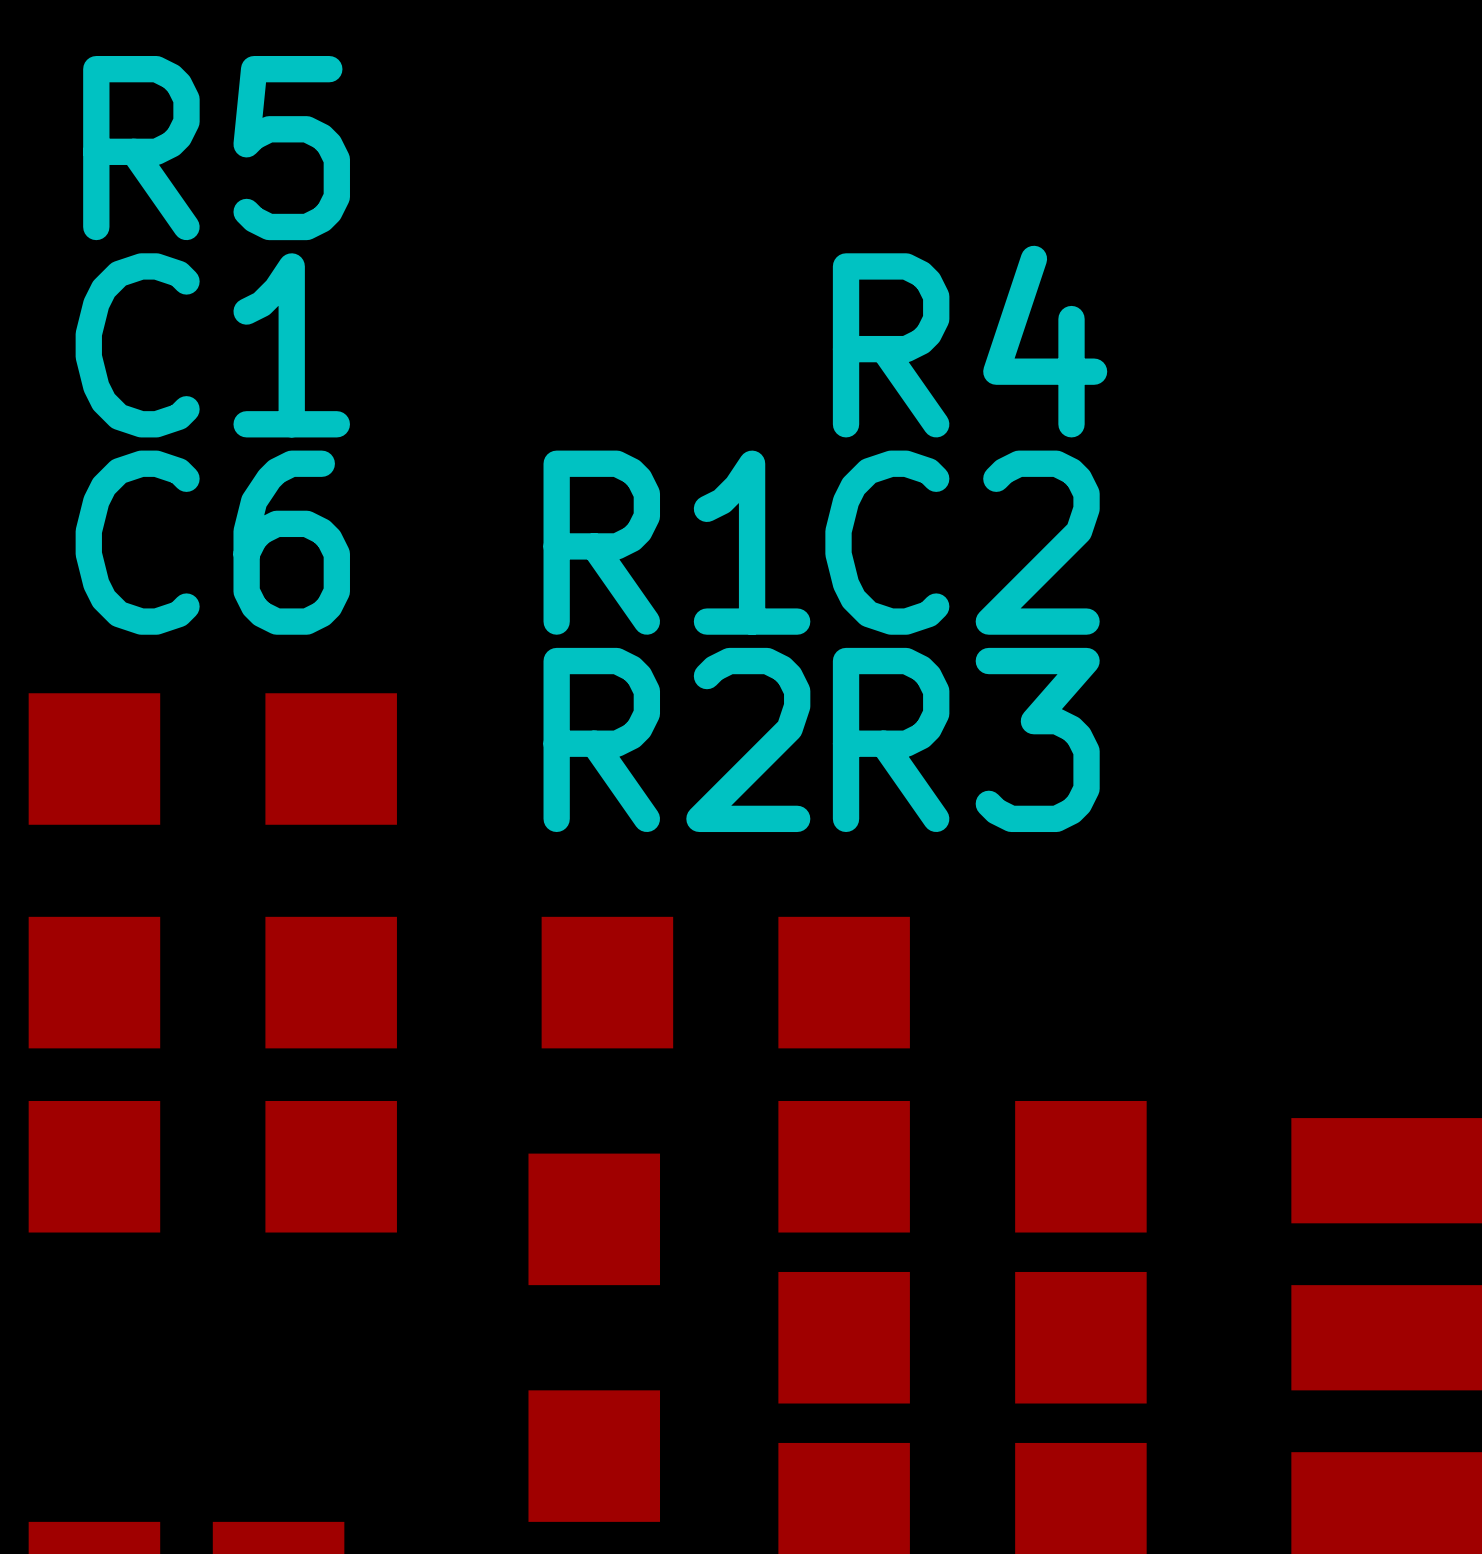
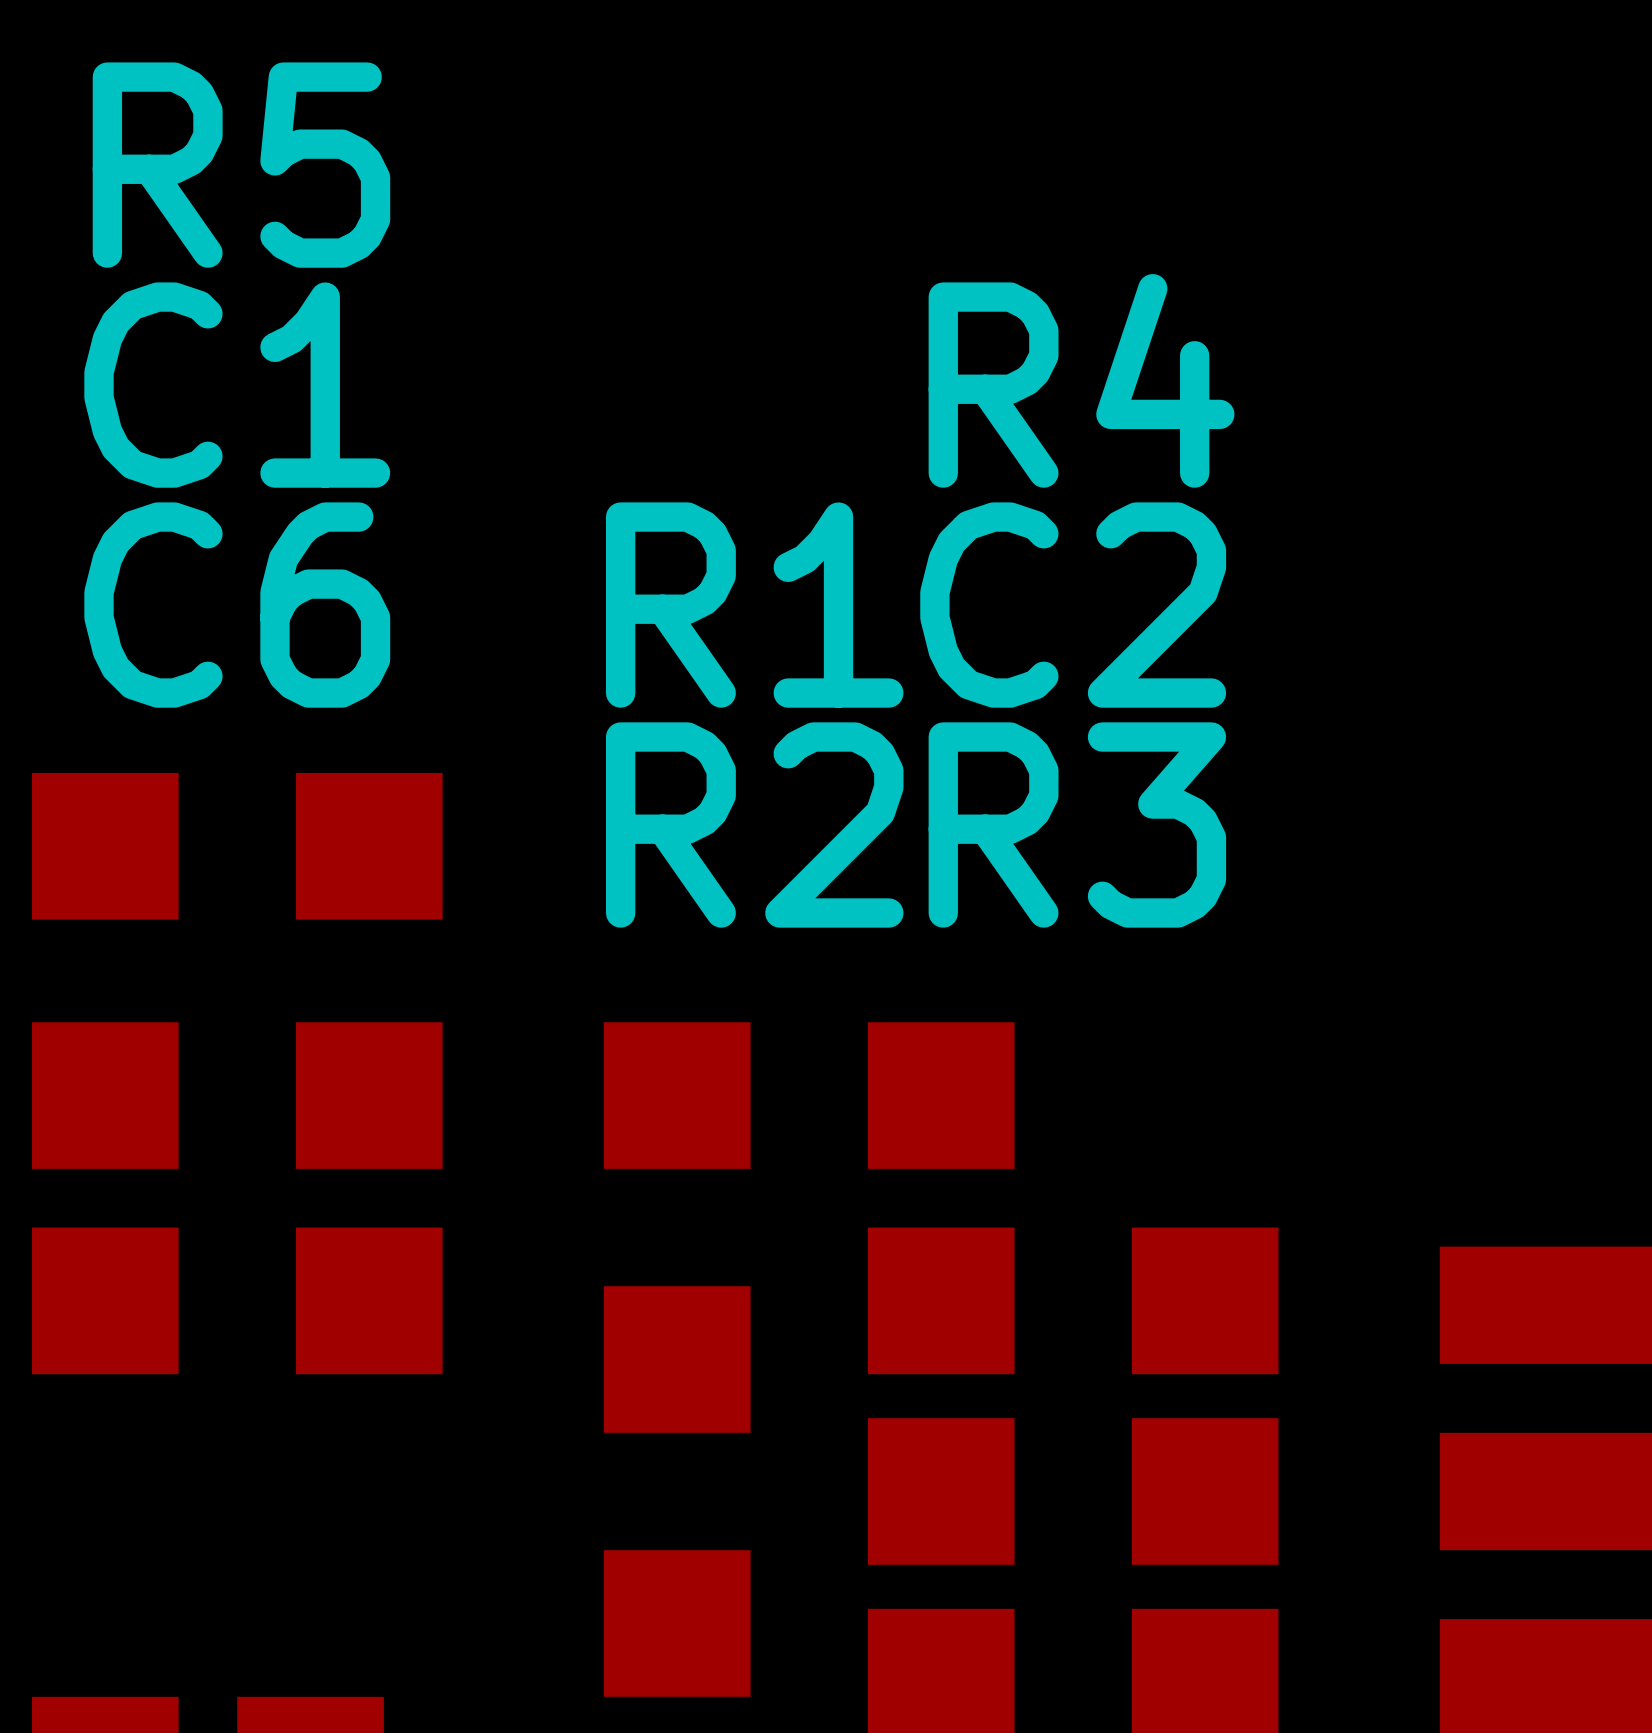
R2 position: (594, 1337) -> (677, 1491)

